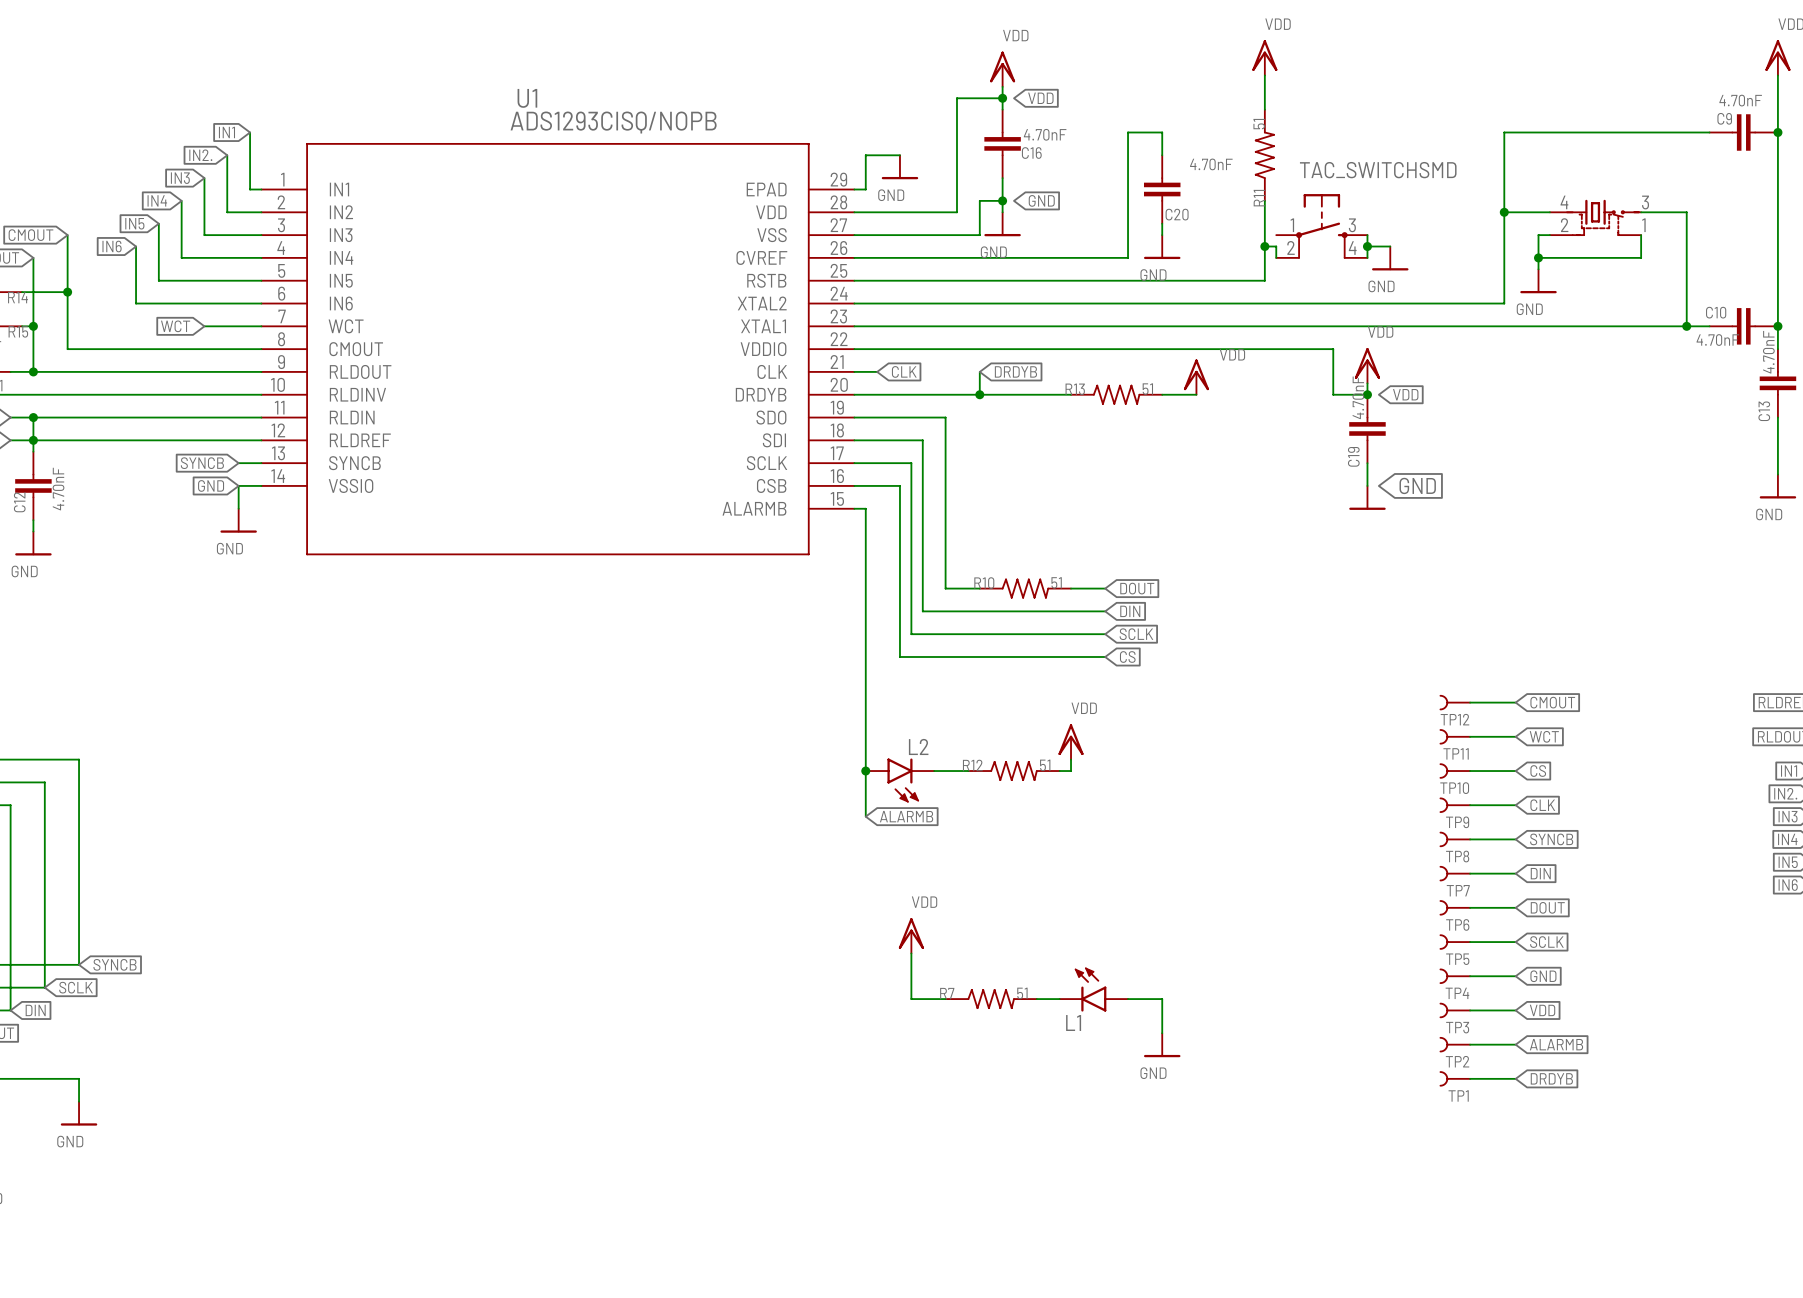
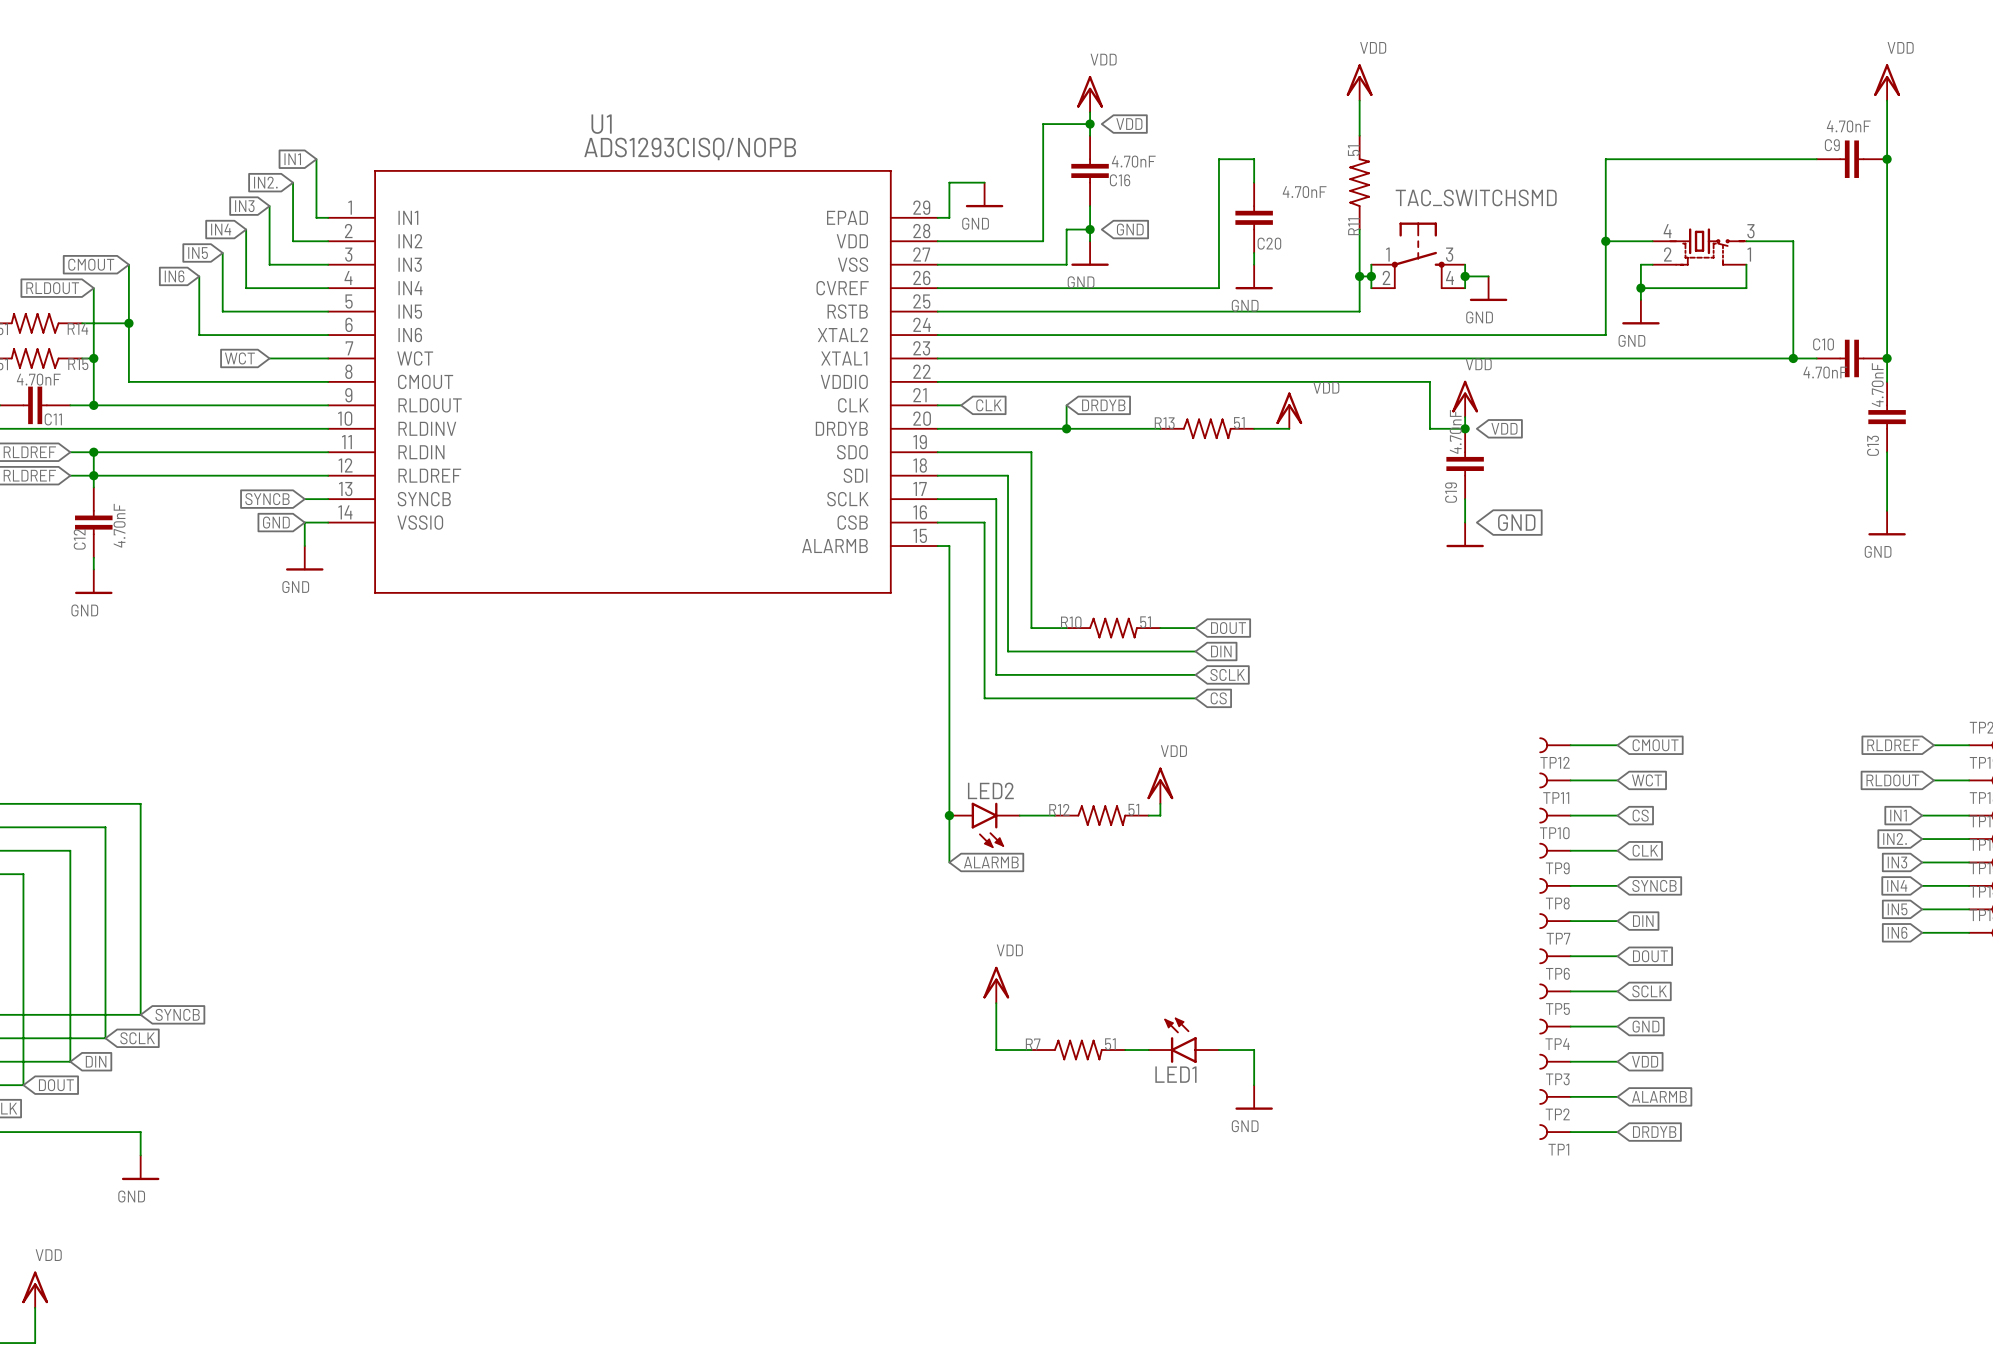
wire: none -> (1371, 264) (1371, 276)
junction: none -> (1371, 276)
L2 name: L2 (918, 746) -> LED2 (990, 790)
L1 name: L1 (1073, 1023) -> LED1 (1175, 1074)

